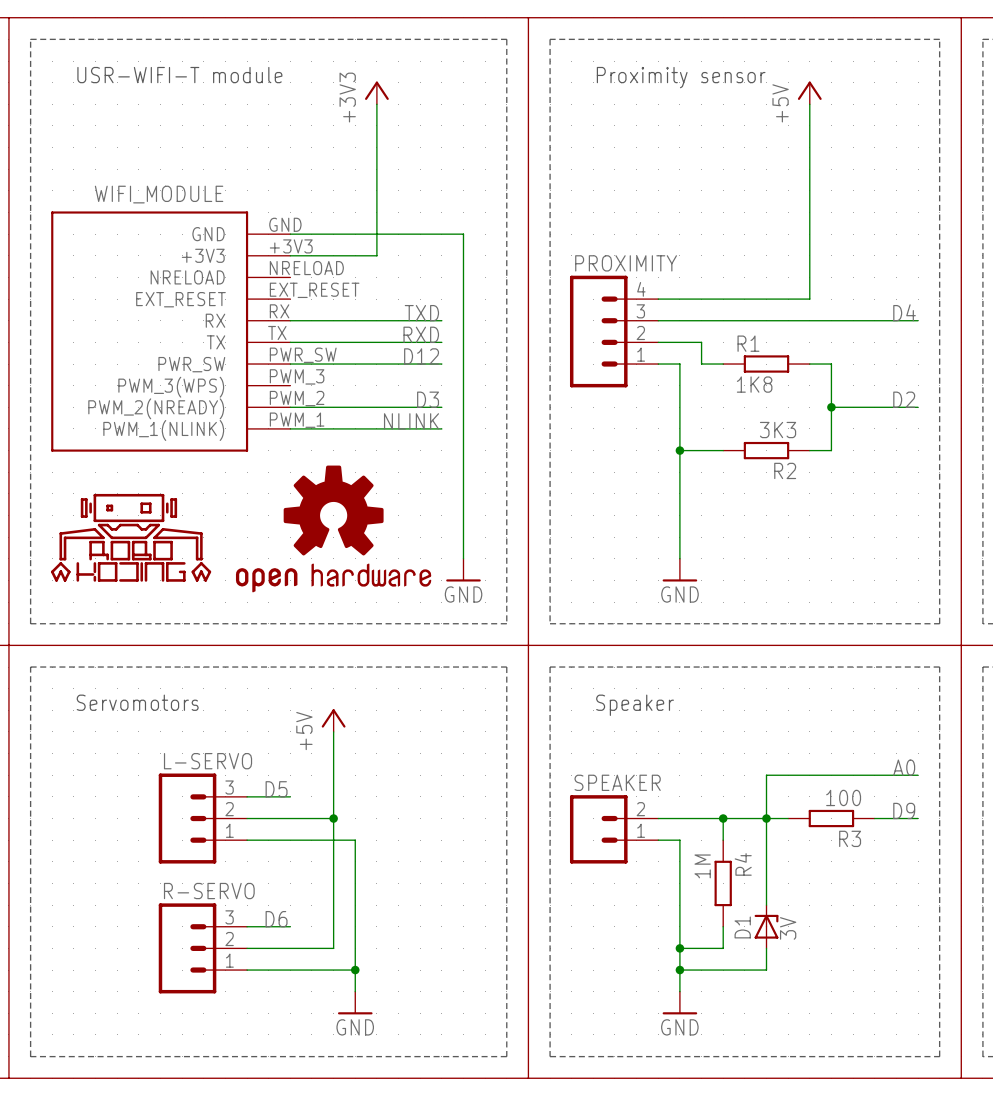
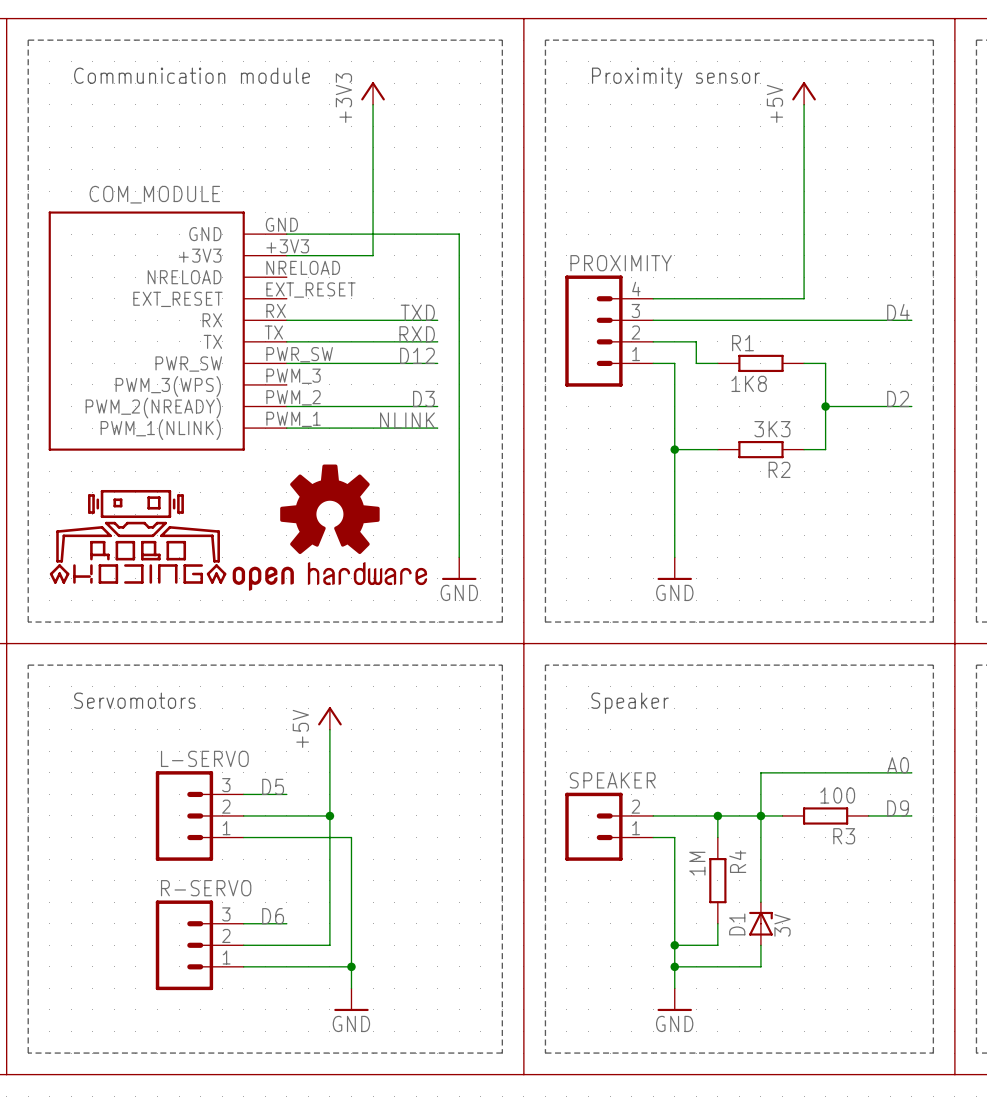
text: USR-WIFI-T module (179, 75) -> Communication module (192, 75)
WIFI_MODULE name: WIFI_MODULE (159, 194) -> COM_MODULE (154, 194)
part: (131, 537) -> none
part: none -> (138, 536)

